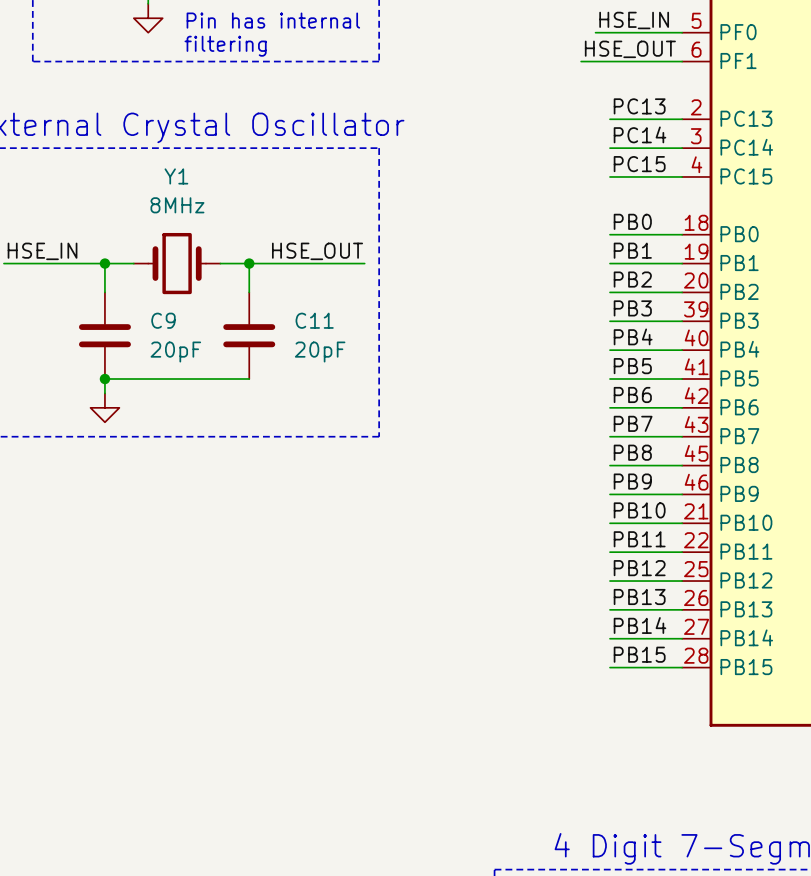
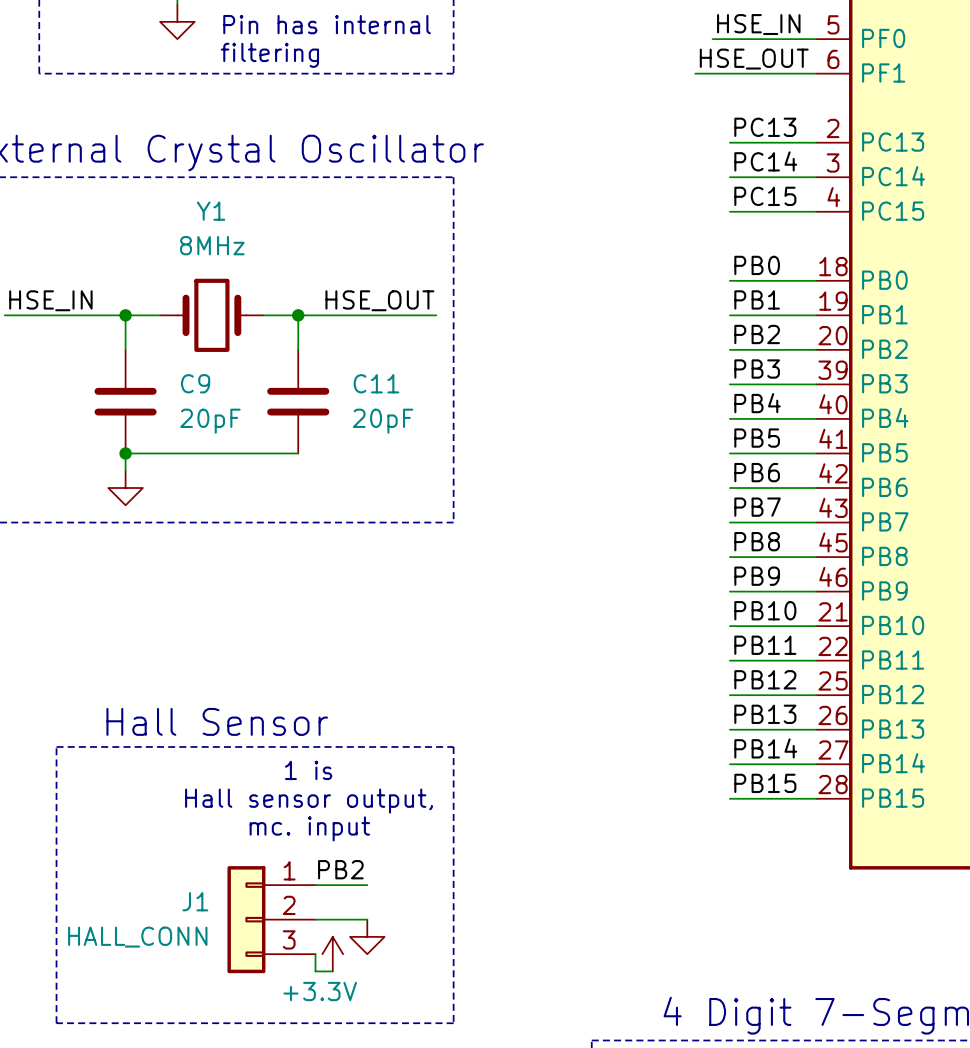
text: none -> Hall Sensor (217, 721)
line: none -> (56, 746) (453, 746) (453, 1023) (56, 1023) (56, 746)
text: none -> 1 is (308, 770)
text: none -> Hall sensor output, (309, 801)
text: none -> mc. input (309, 828)
label: none -> PB2 (340, 869)
wire: none -> (315, 885) (367, 885)
J1: none -> HALL_CONN (271, 919)
wire: none -> (315, 919) (367, 919)
power symbol: none -> (367, 936)
wire: none -> (315, 954) (315, 971) (332, 971)
power symbol: none -> +3.3V (332, 954)

